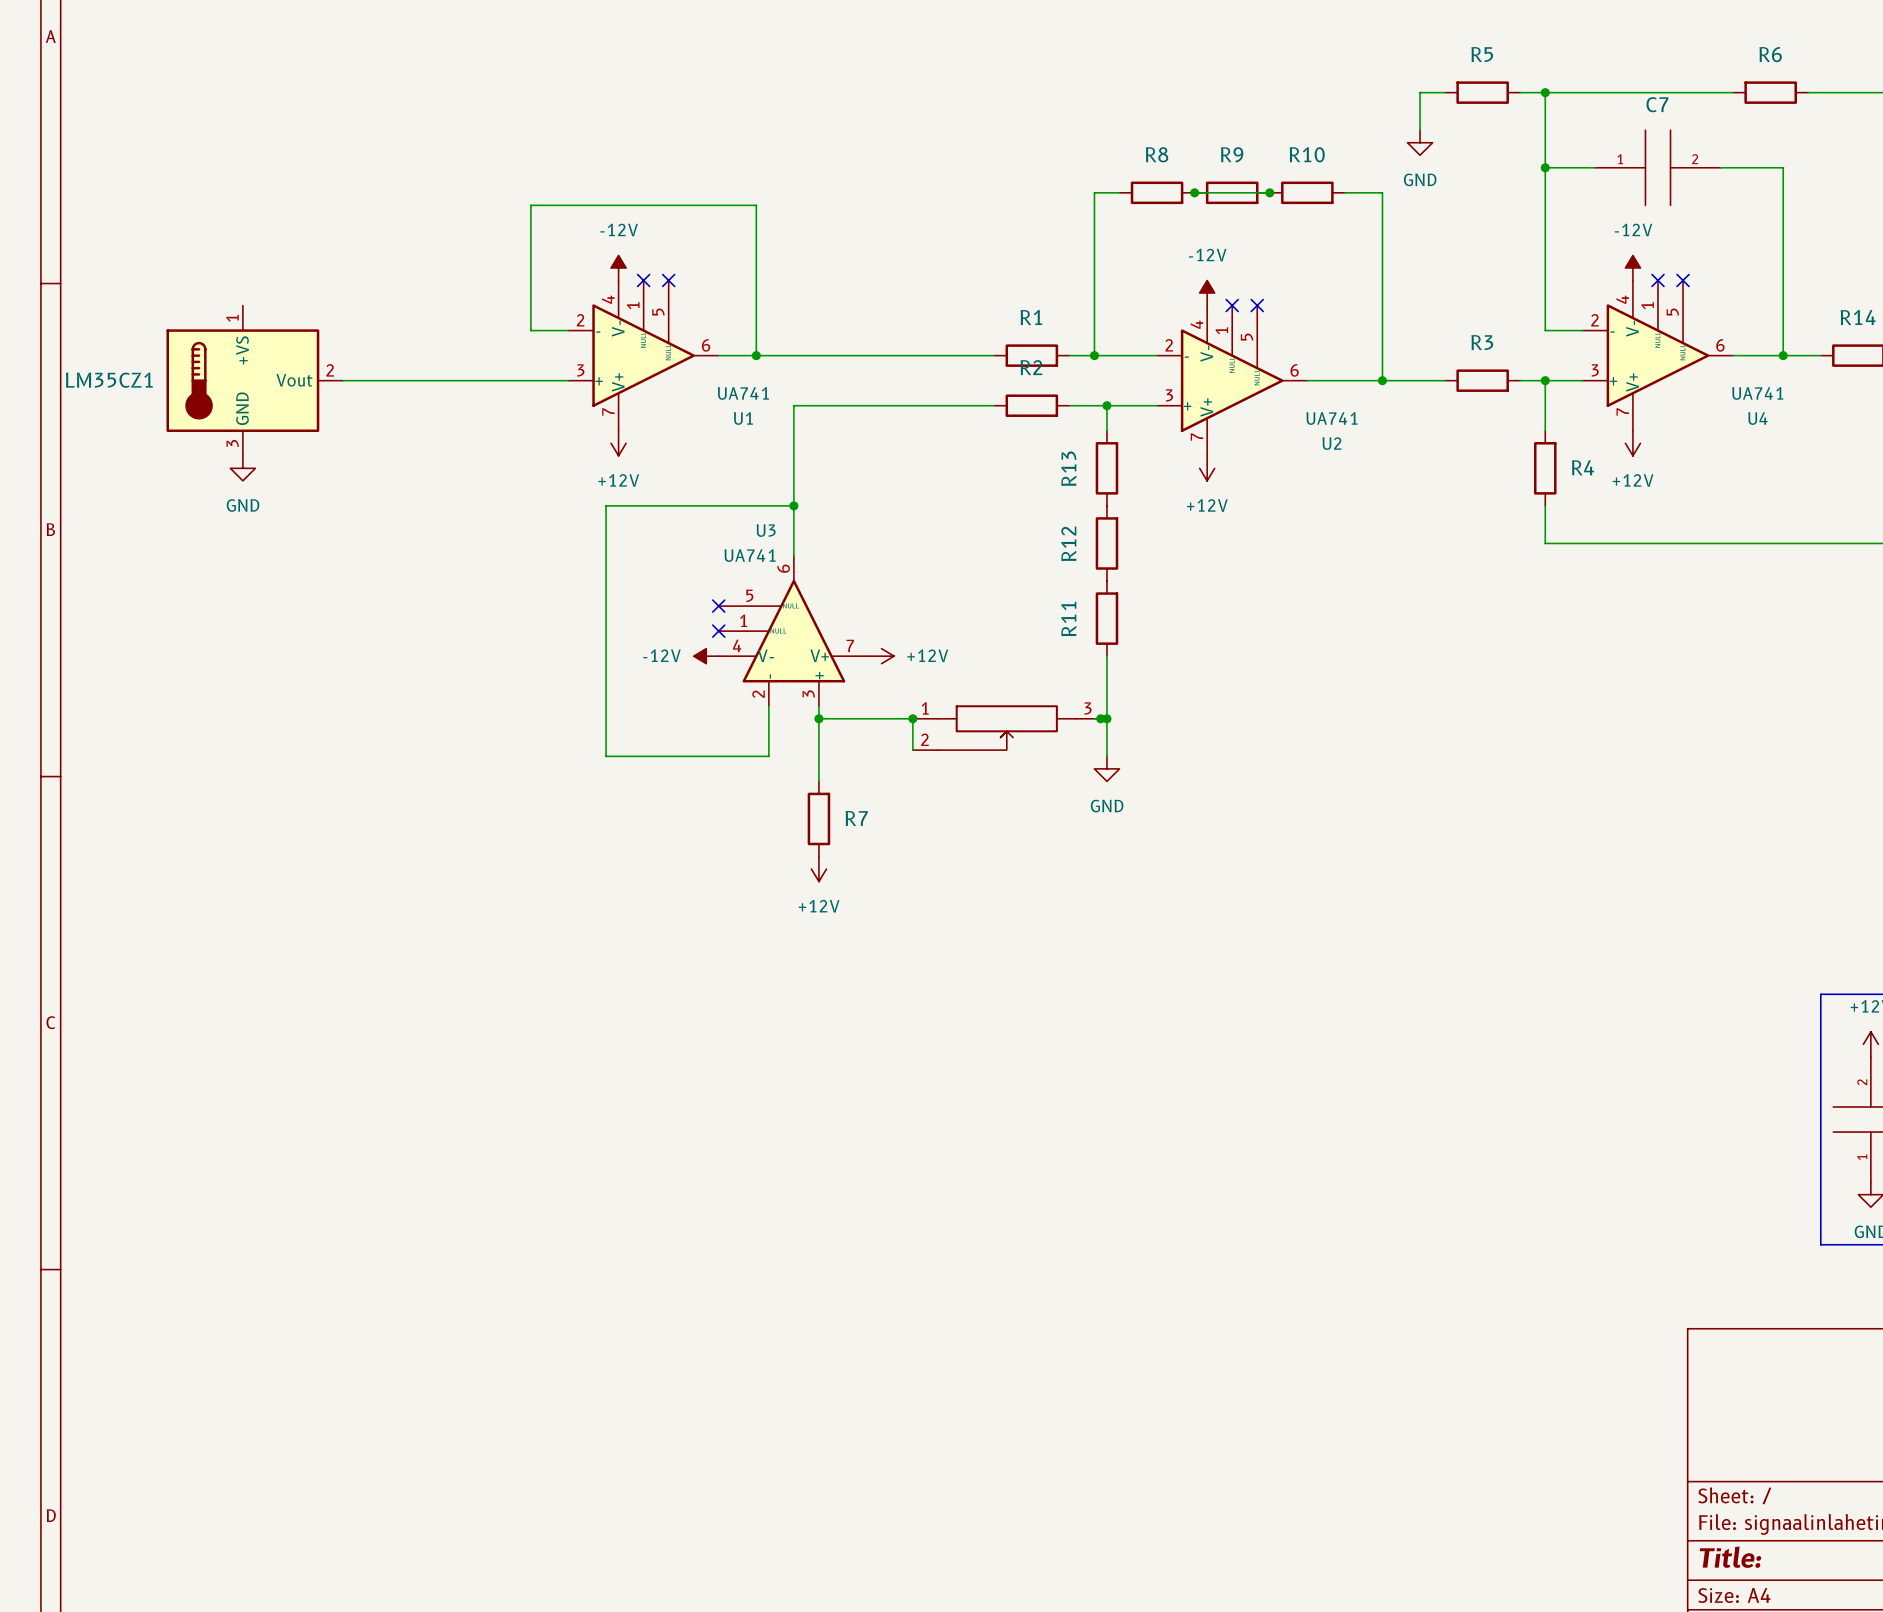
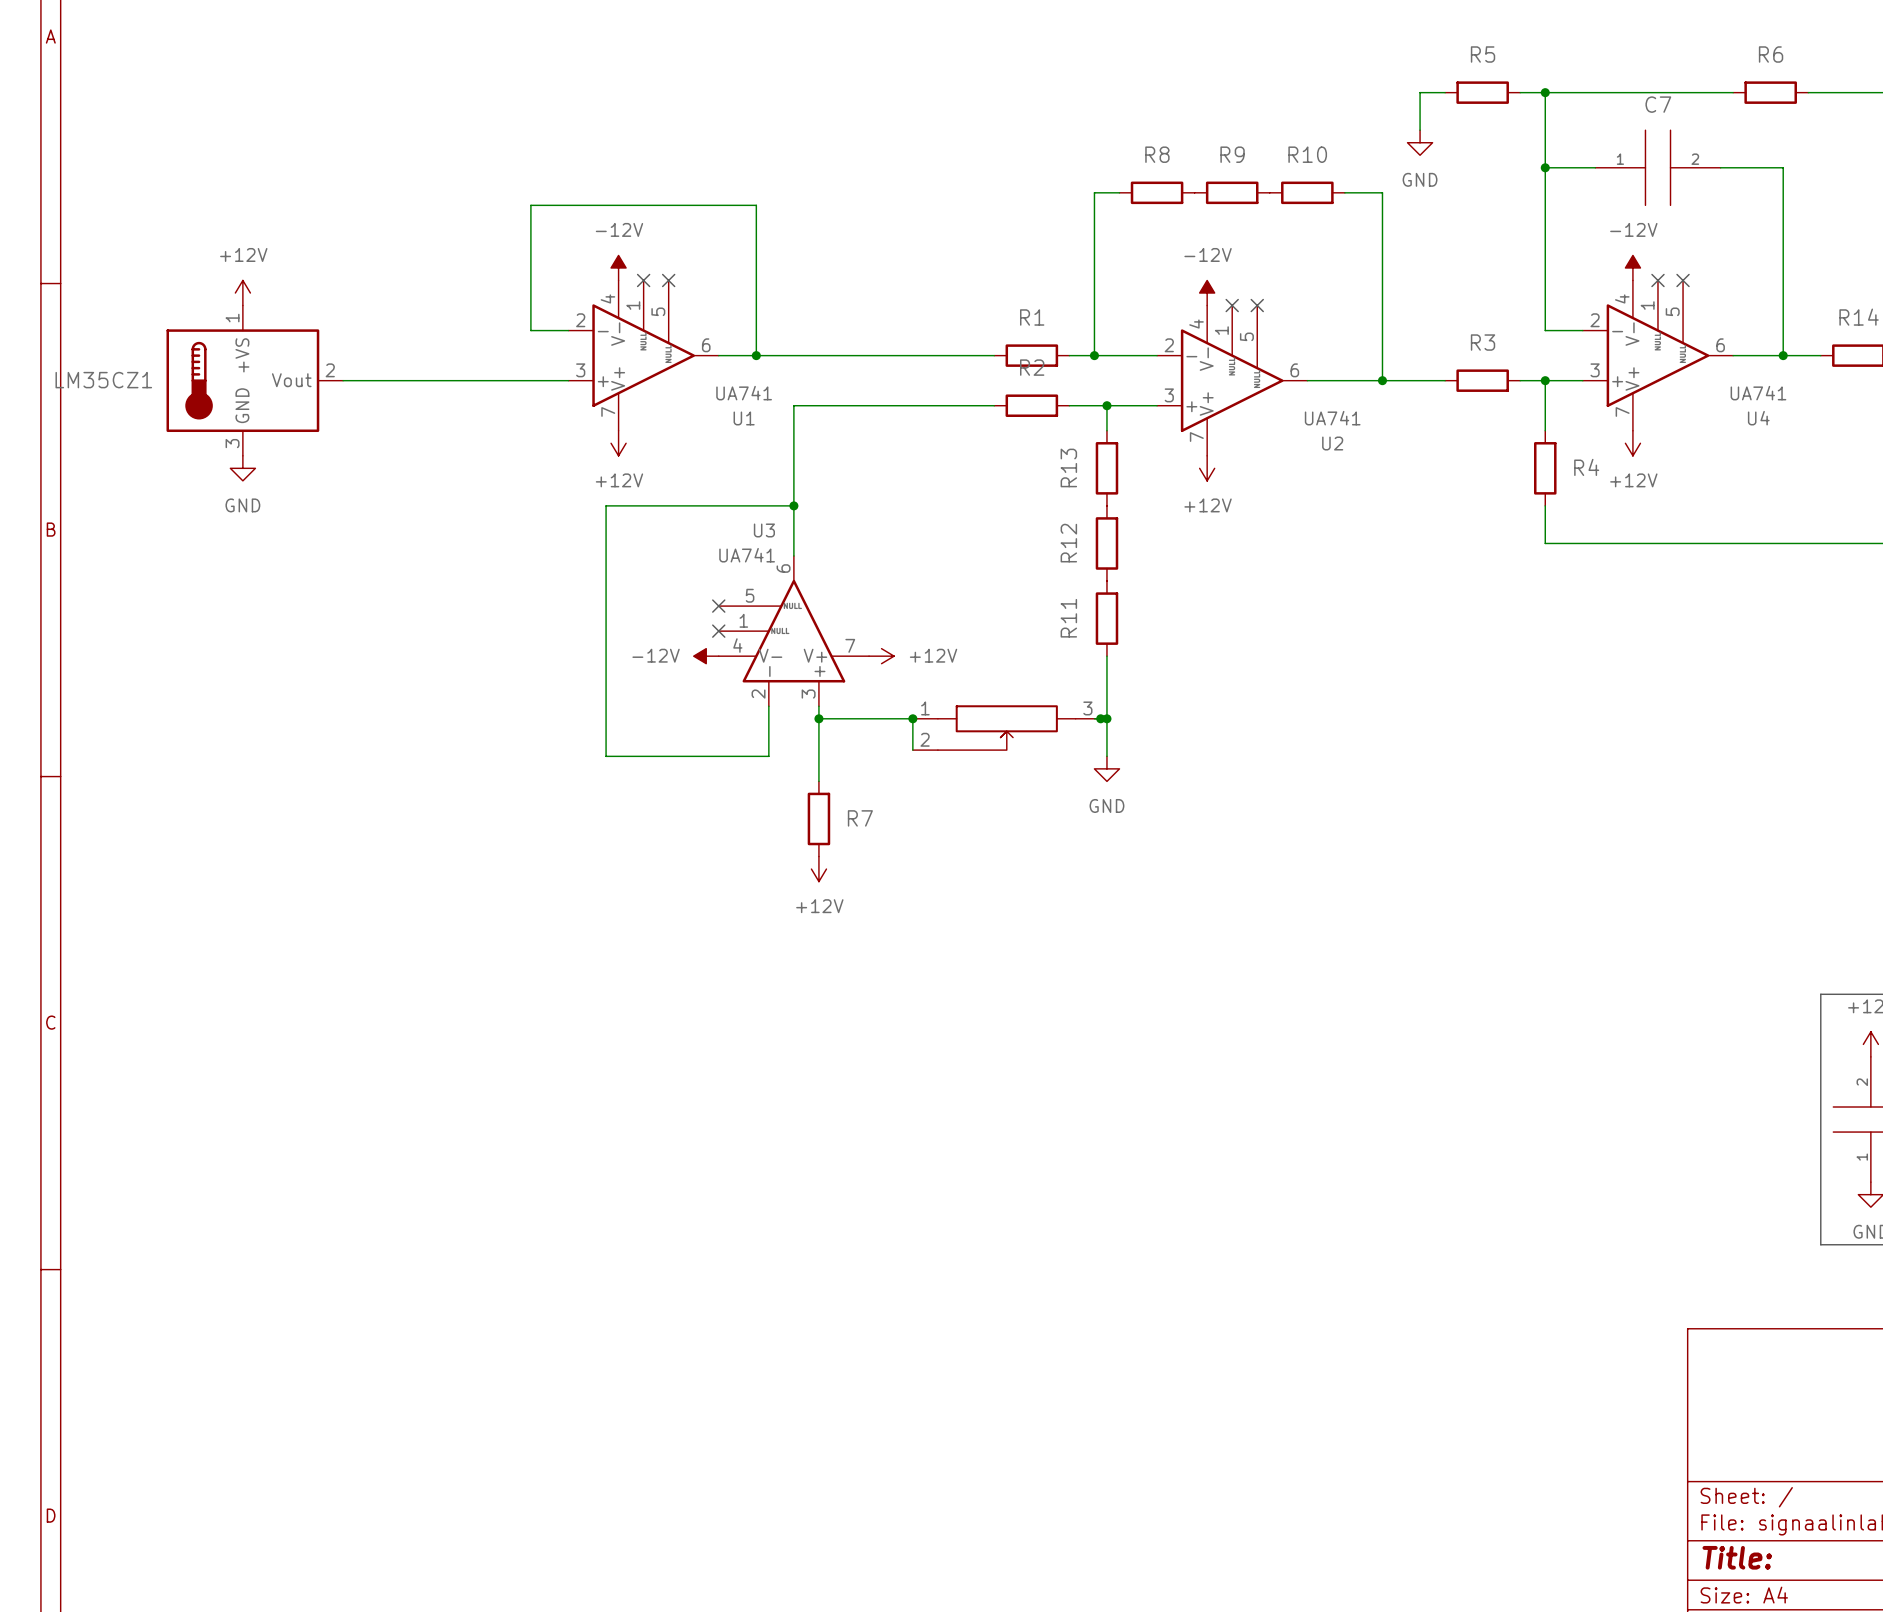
wire: (1194, 192) (1269, 192) -> none
junction: (1194, 192) -> none
junction: (1269, 192) -> none
power symbol: none -> +12V (242, 293)

